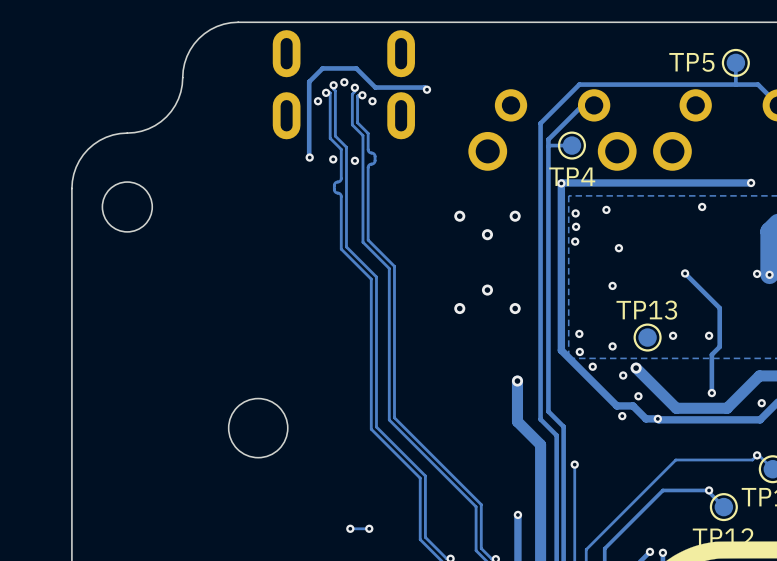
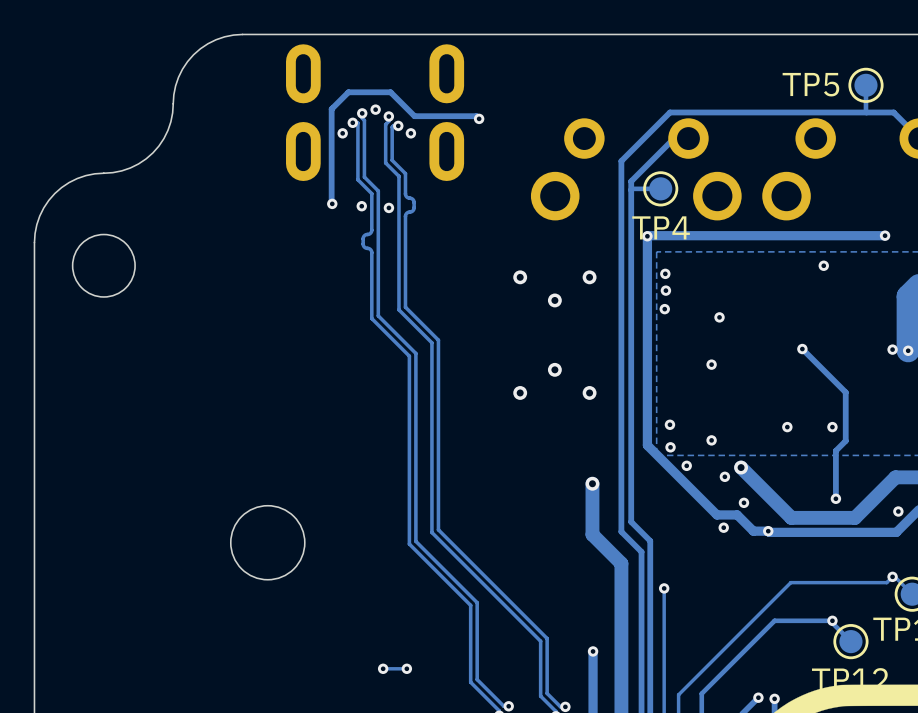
via: (606, 209) -> none
TP13: (647, 337) -> none

